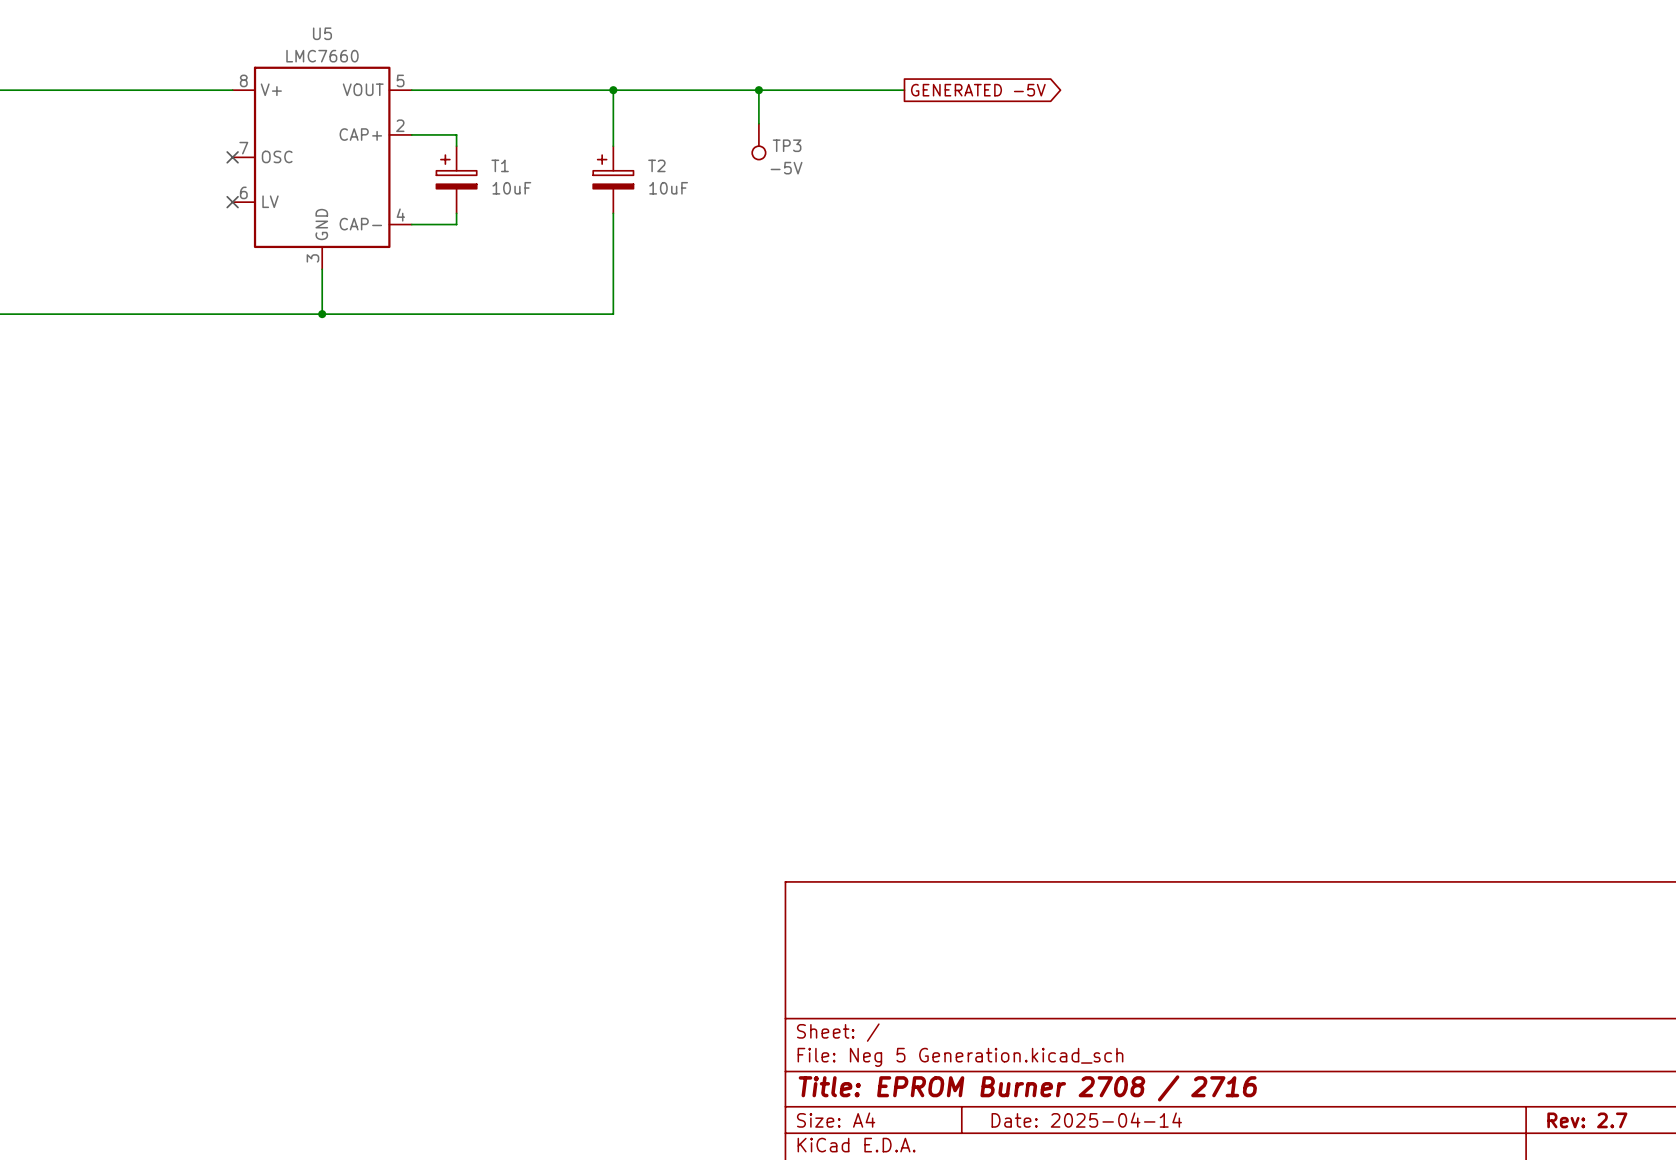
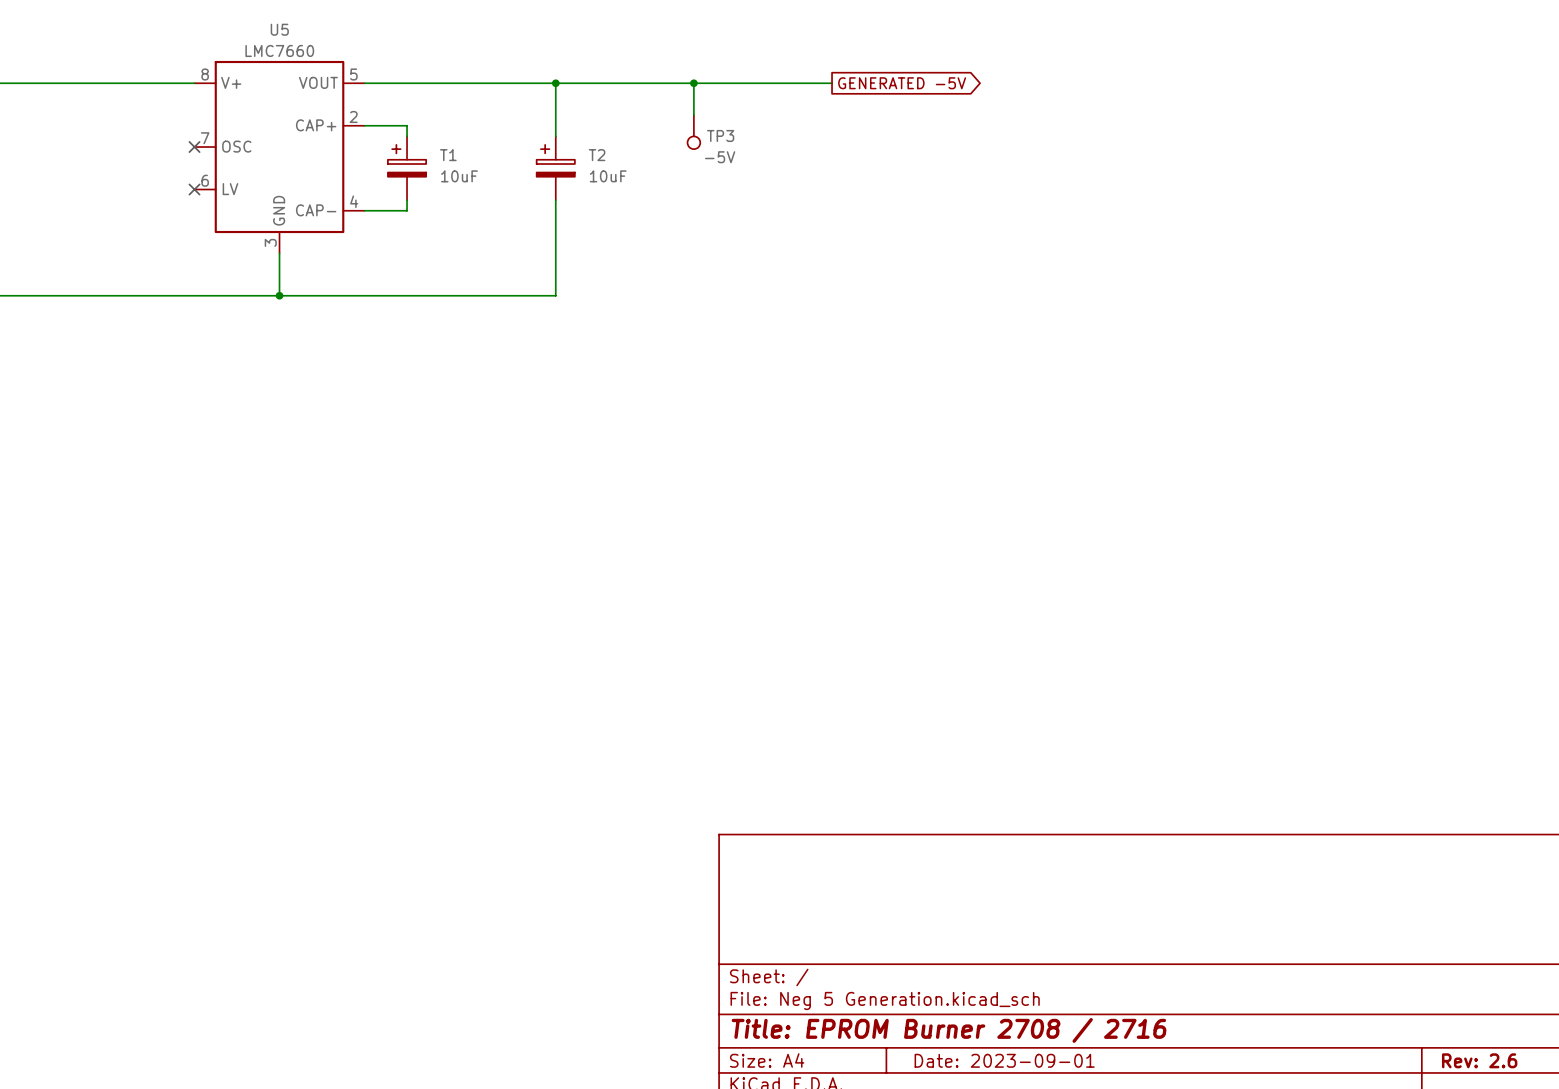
title block: Date: 2025-04-14 (1086, 1120) -> Date: 2023-09-01 (1004, 1060)
title block: Rev: 2.7 (1587, 1120) -> Rev: 2.6 (1479, 1060)

